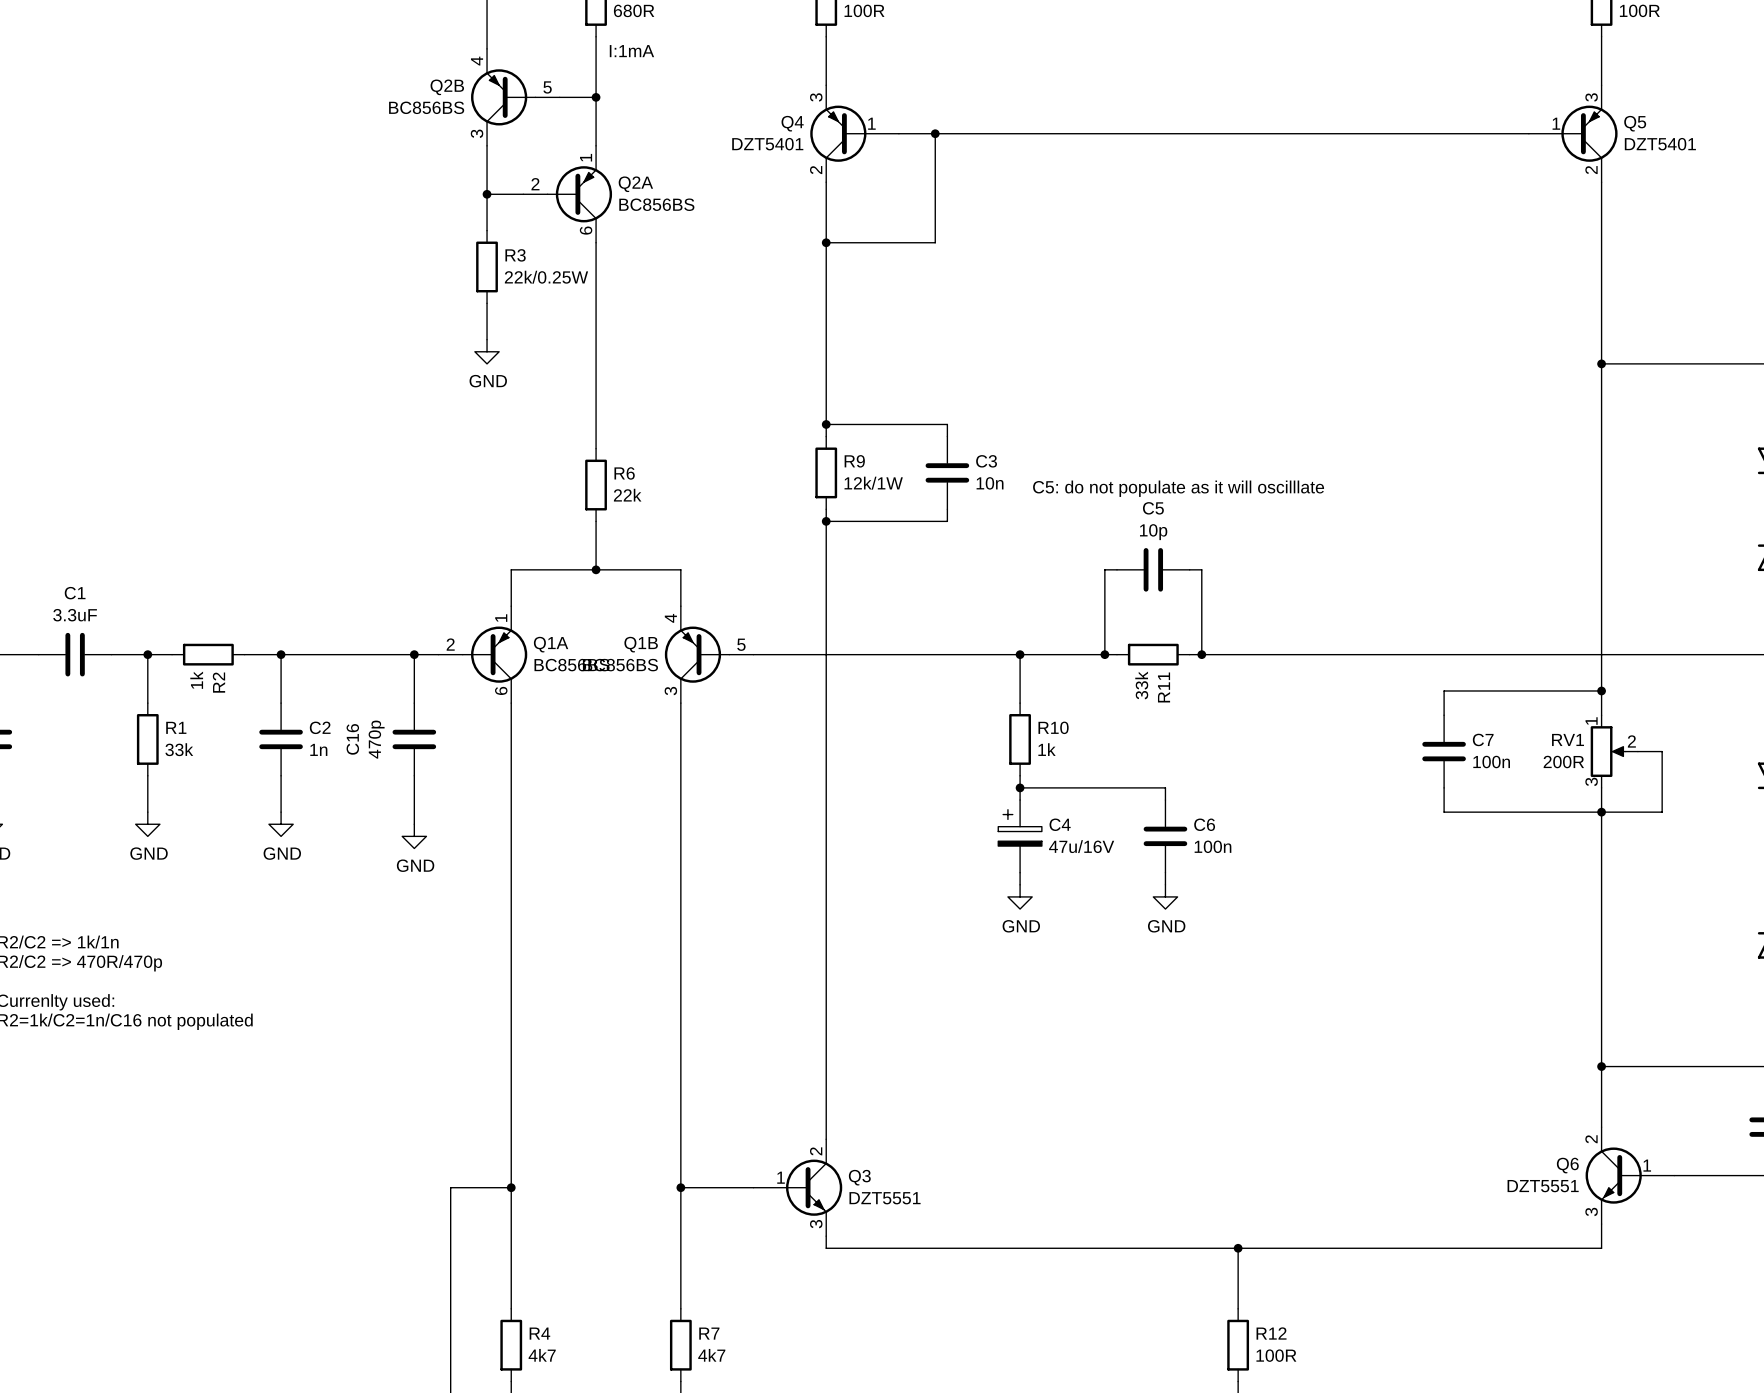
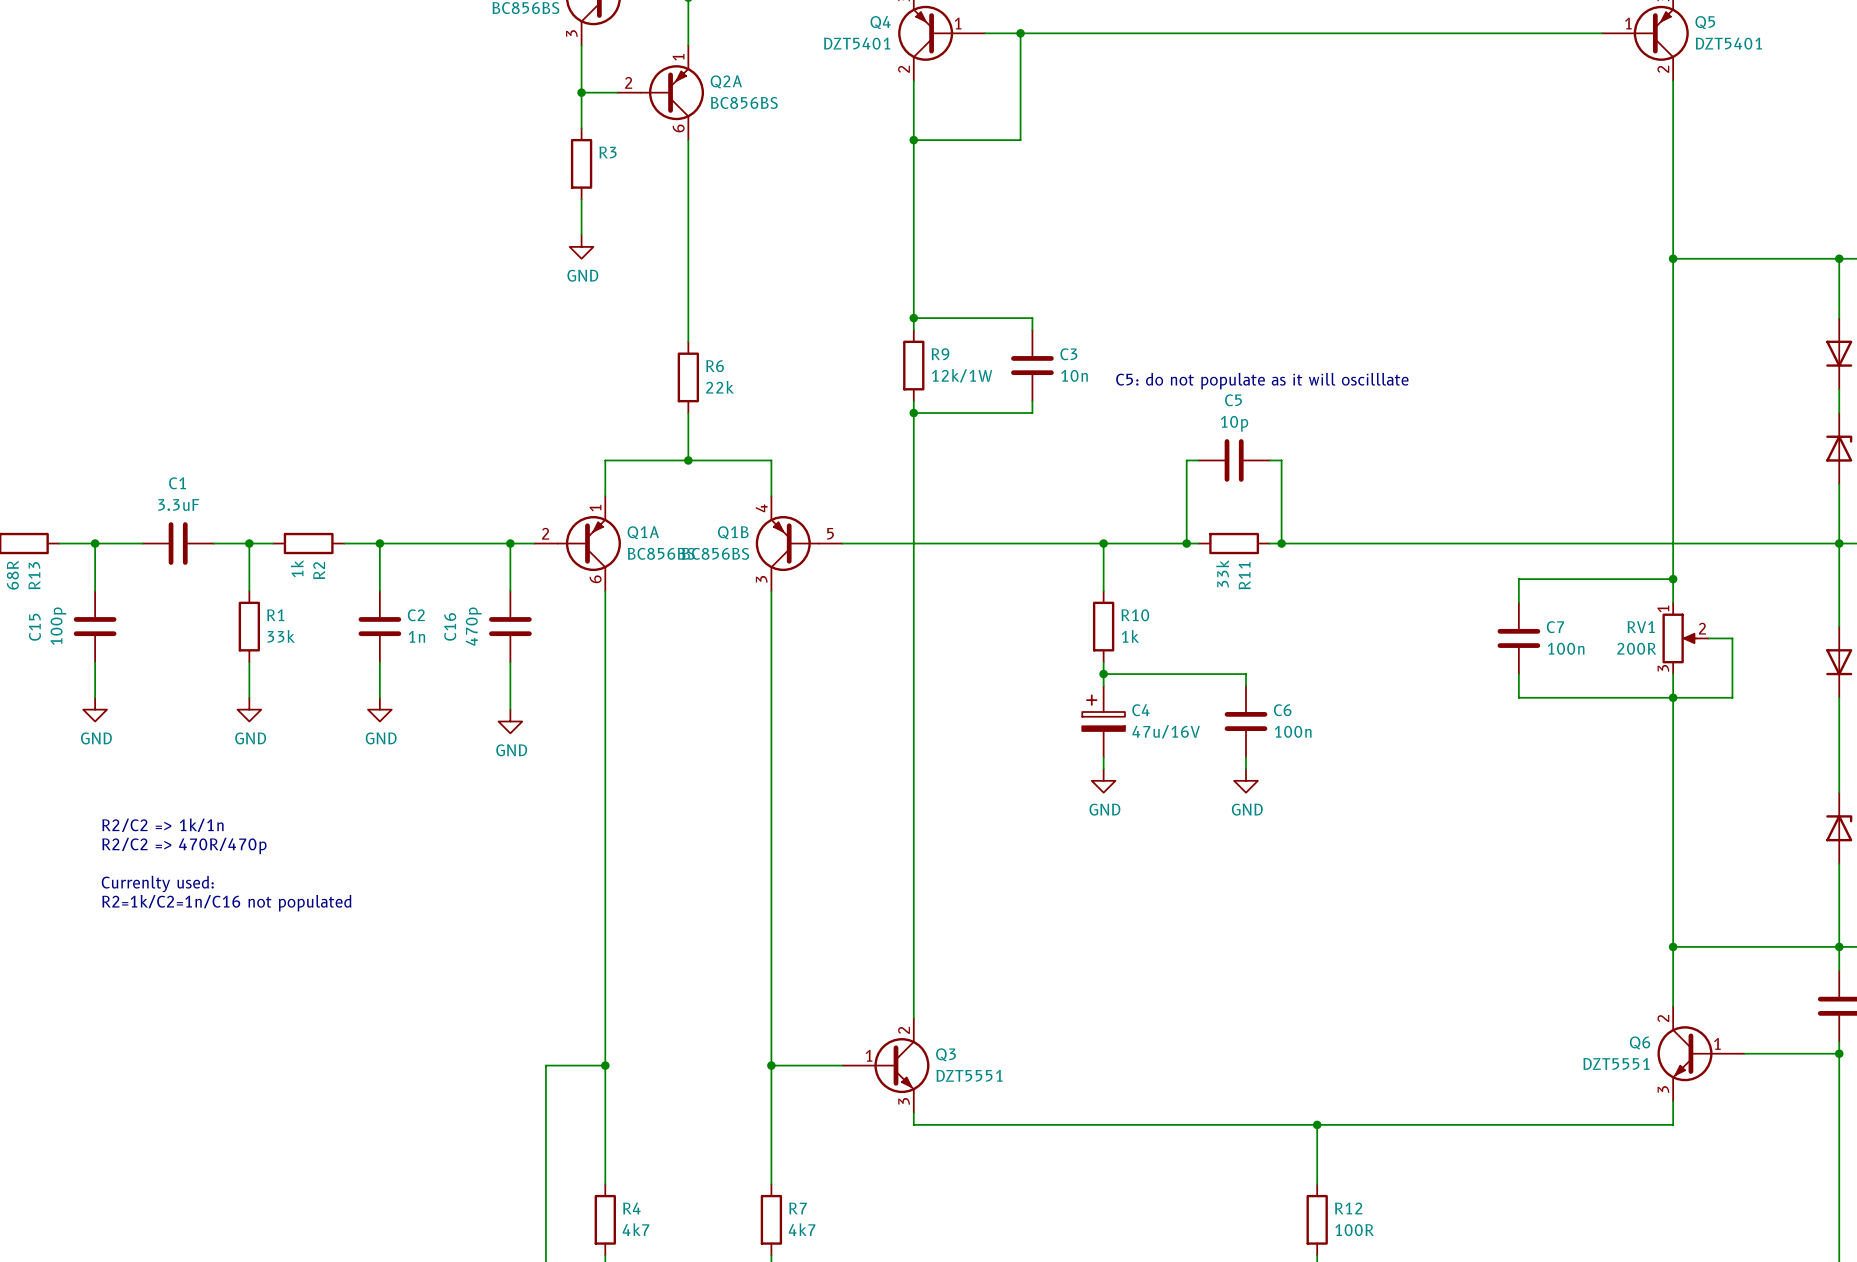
R3 value: 22k/0.25W (546, 277) -> none

